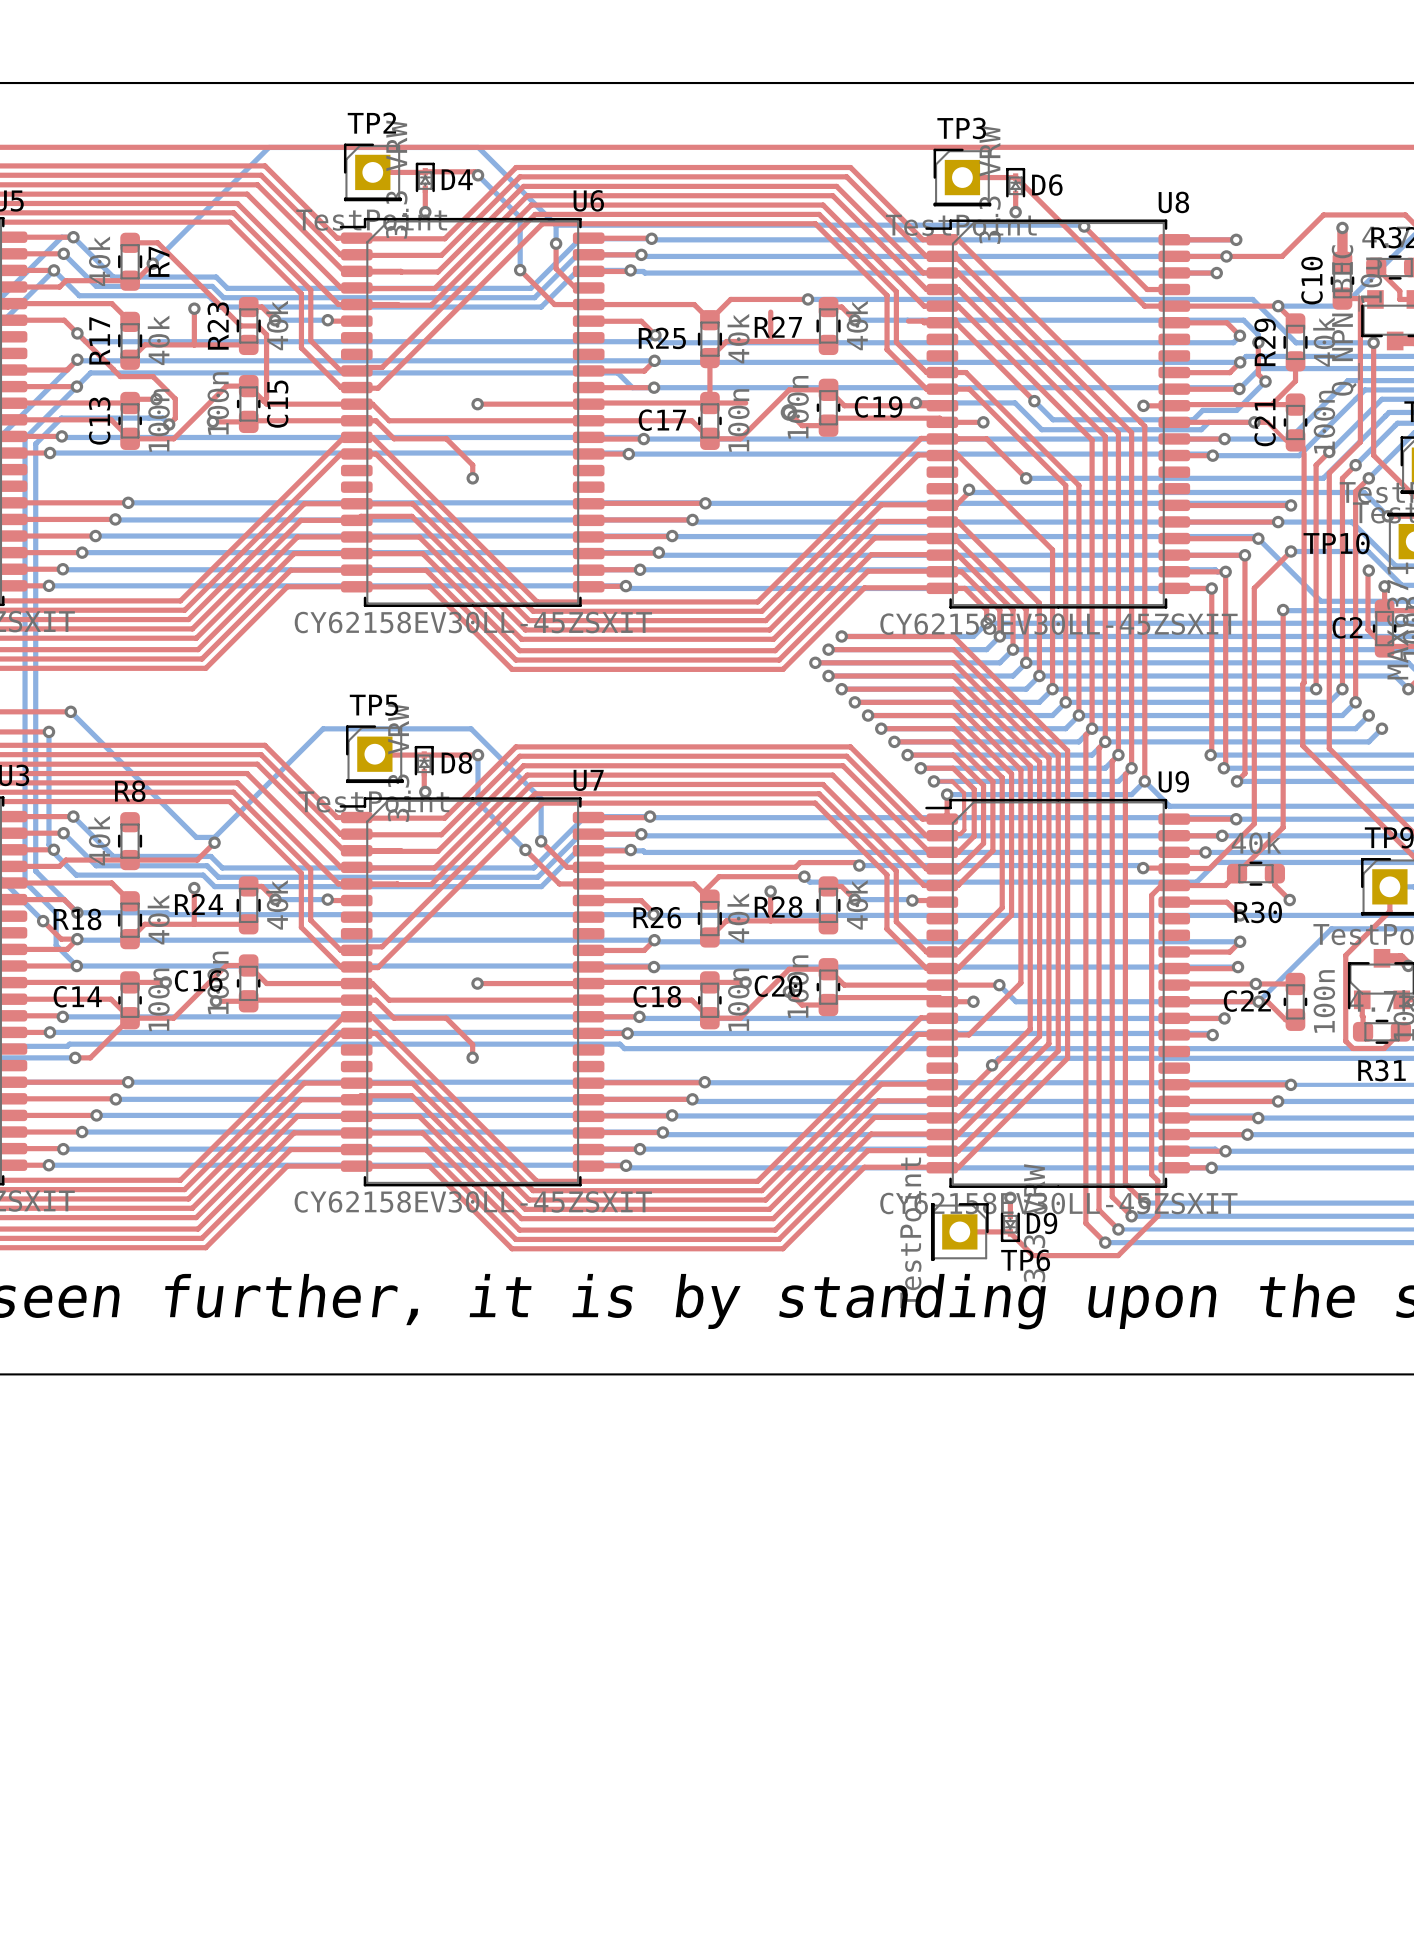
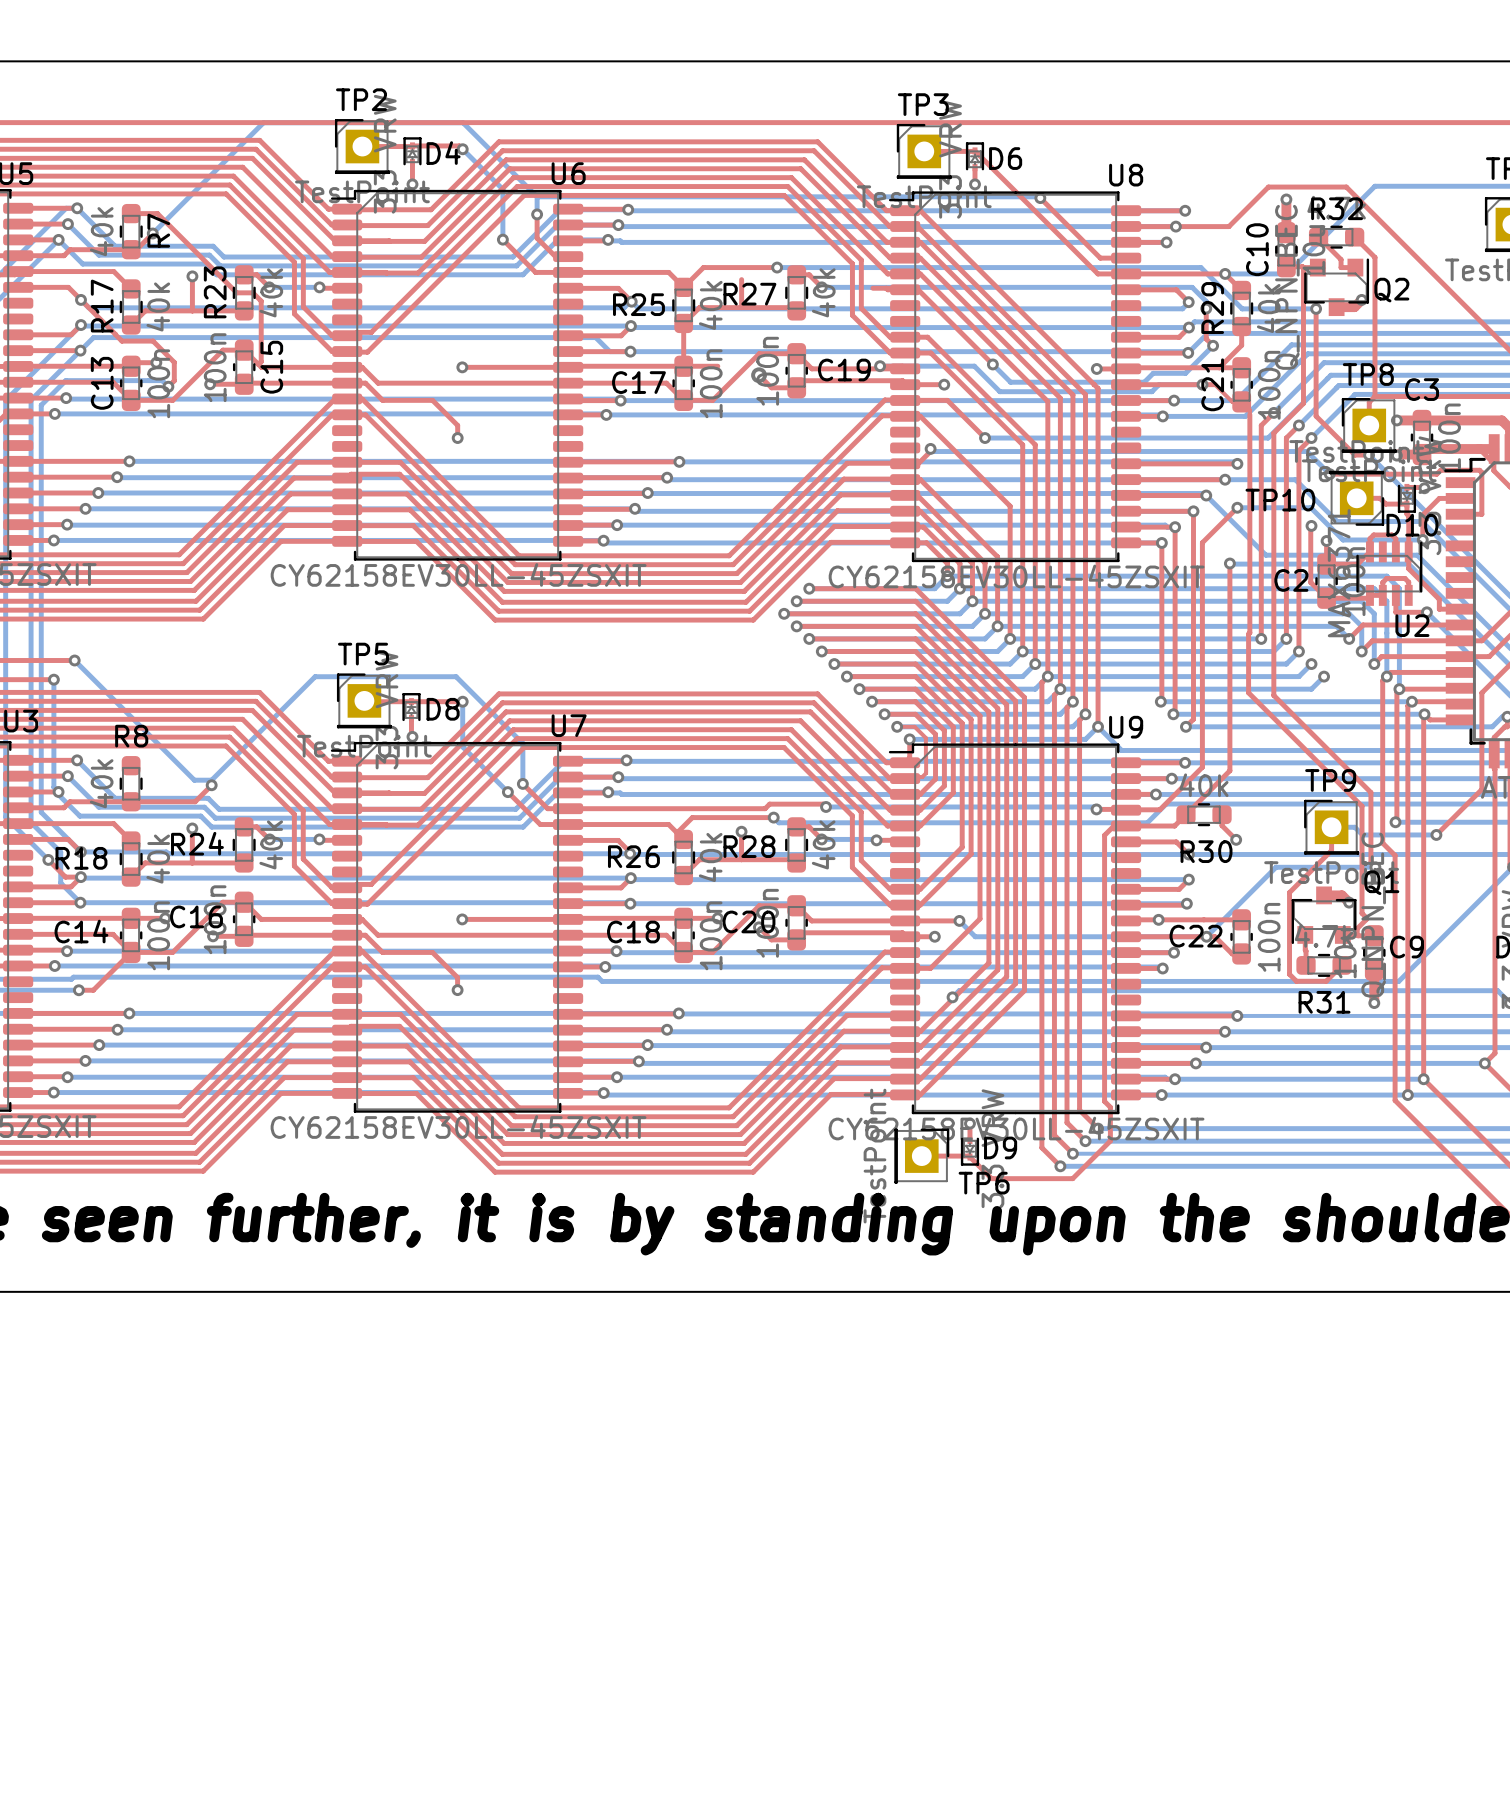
via position: (1255, 983) -> (1158, 919)

